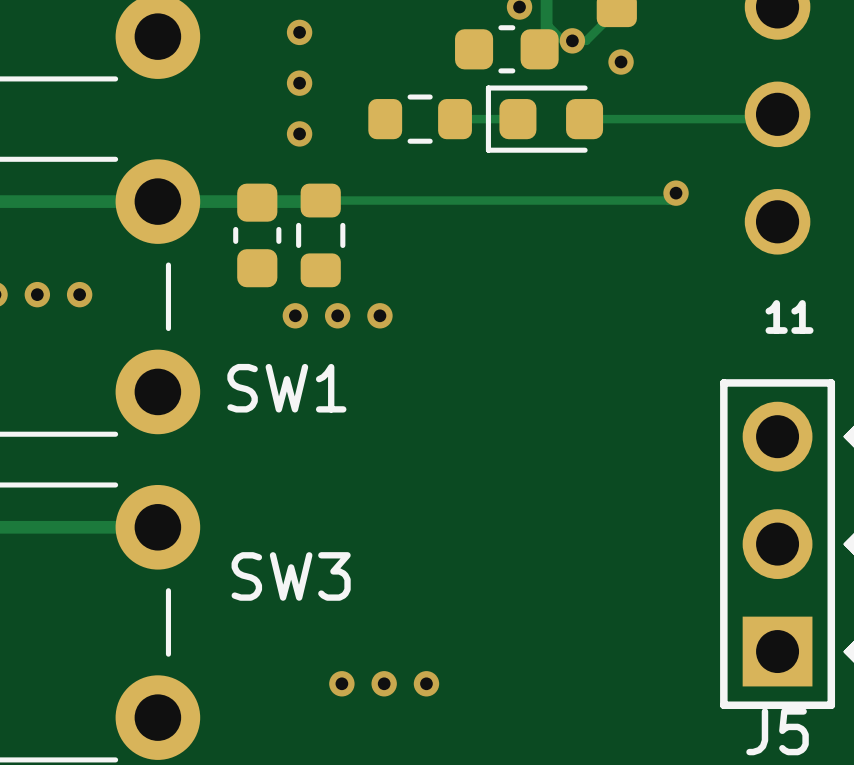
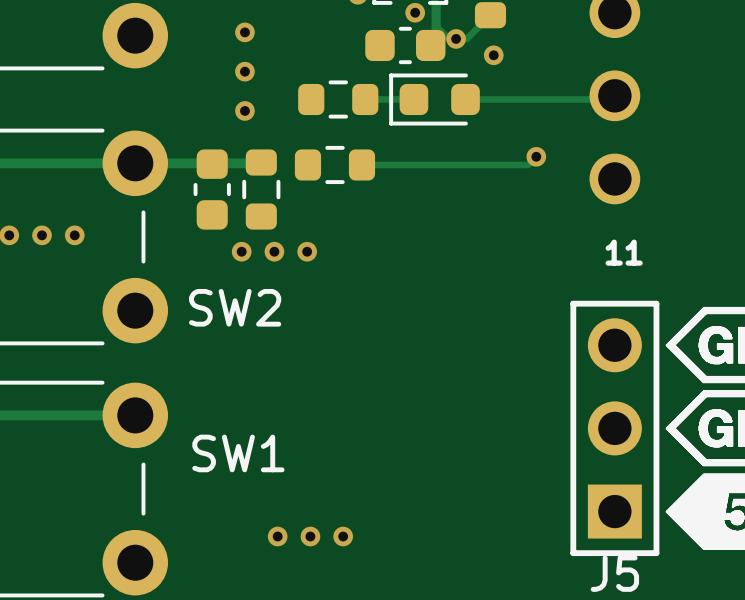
track: (320, 200) (668, 200) -> (361, 164) (528, 164) (530, 162)
part: none -> (334, 164)
SW1 name: SW1 (286, 388) -> SW2 (235, 307)
SW3 name: SW3 (291, 576) -> SW1 (238, 453)

